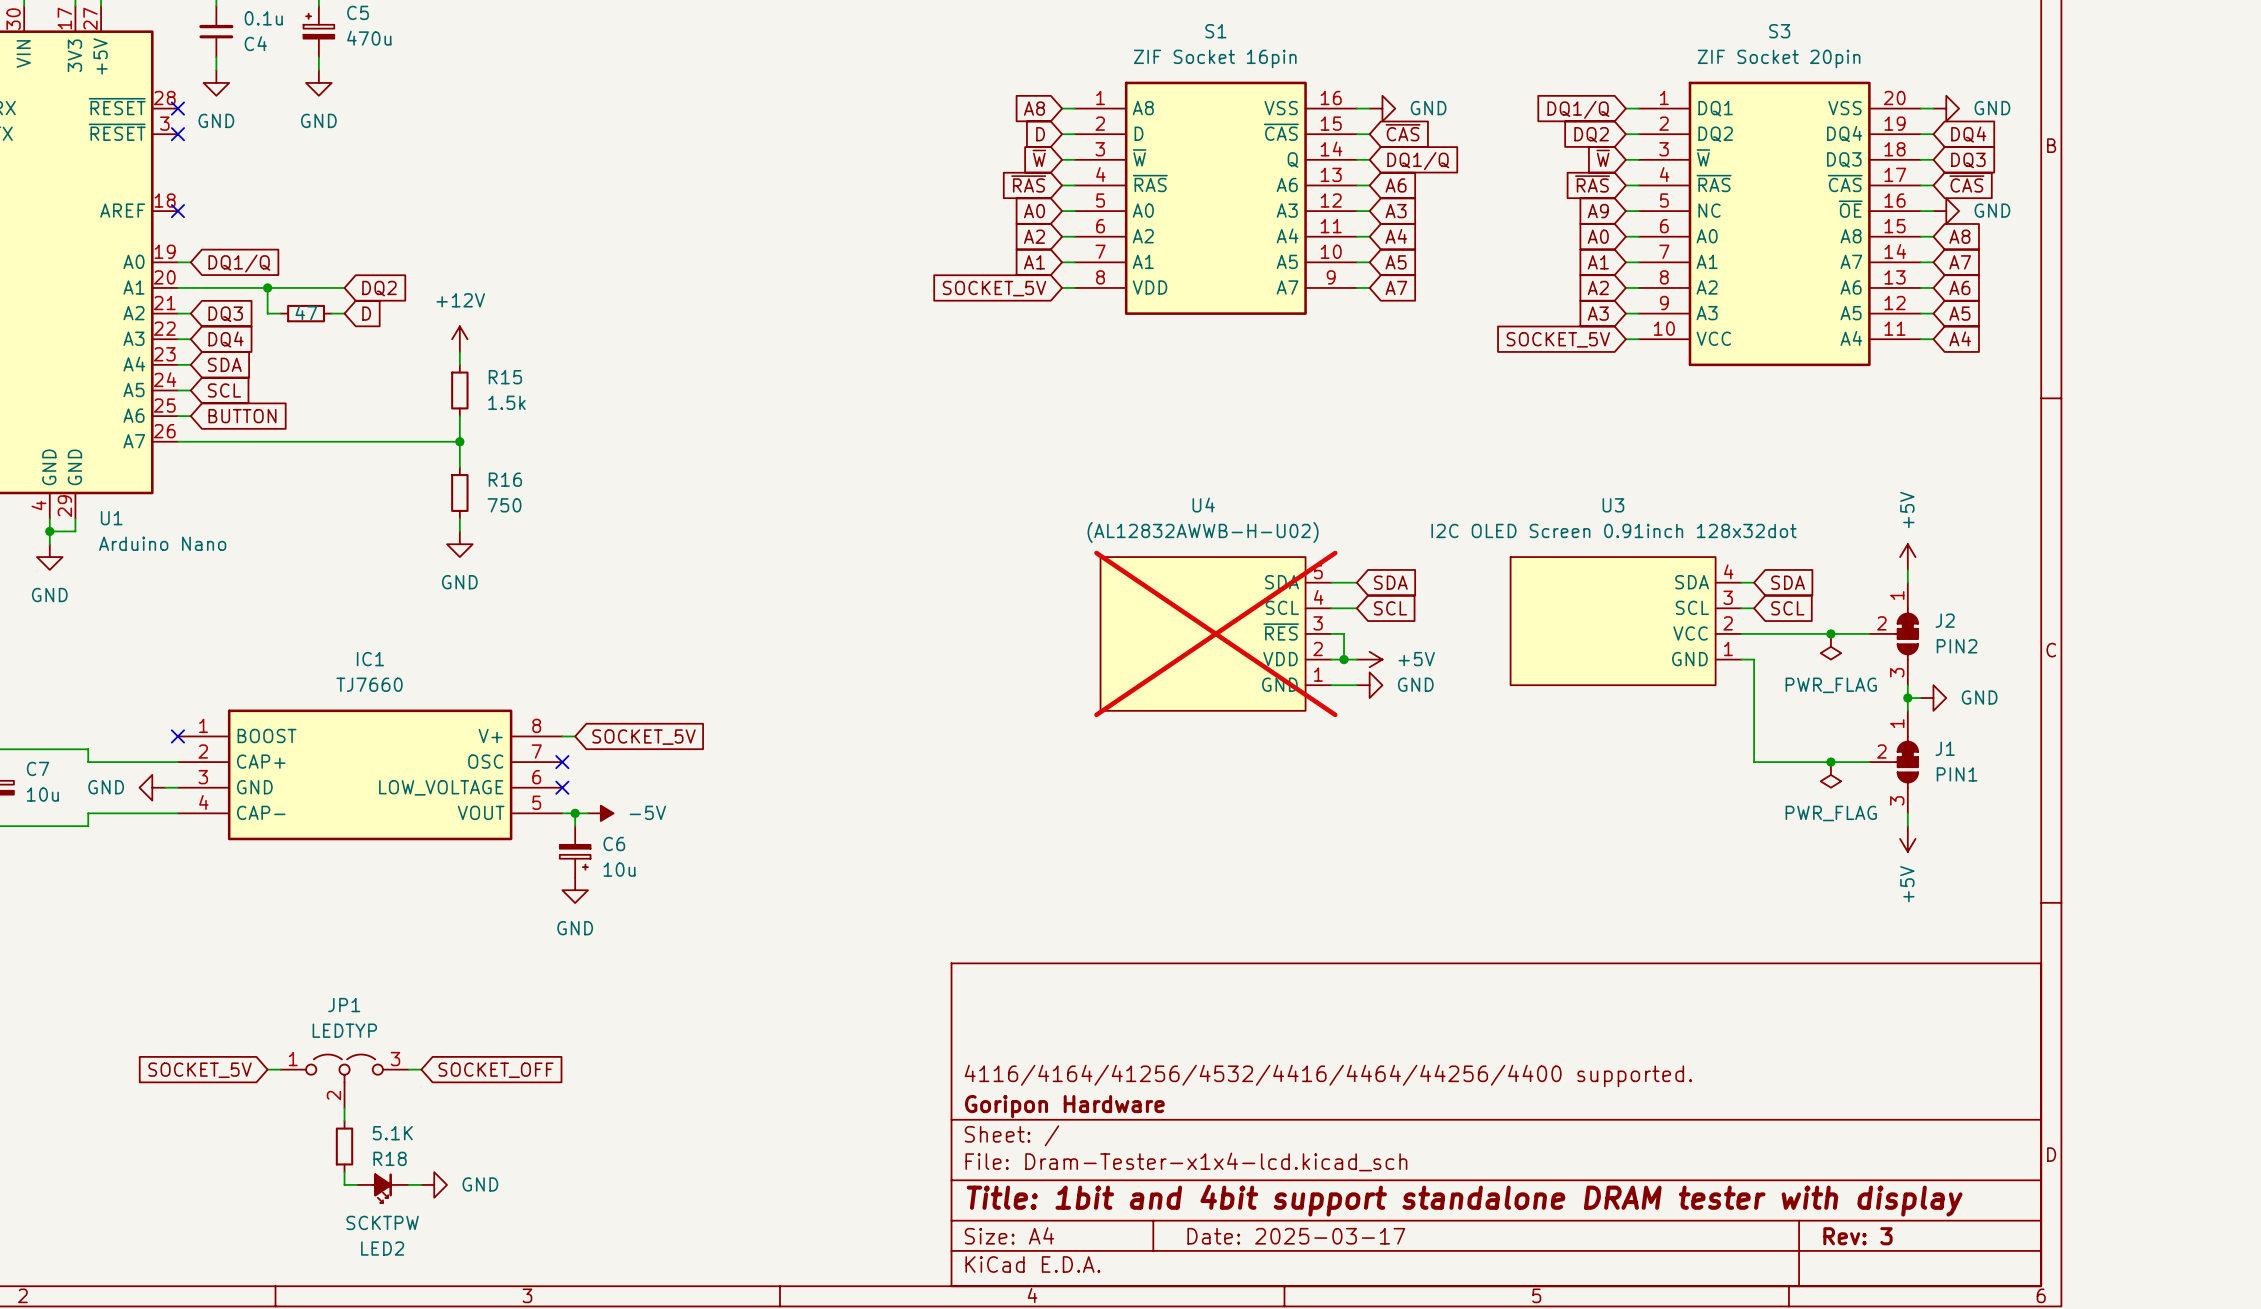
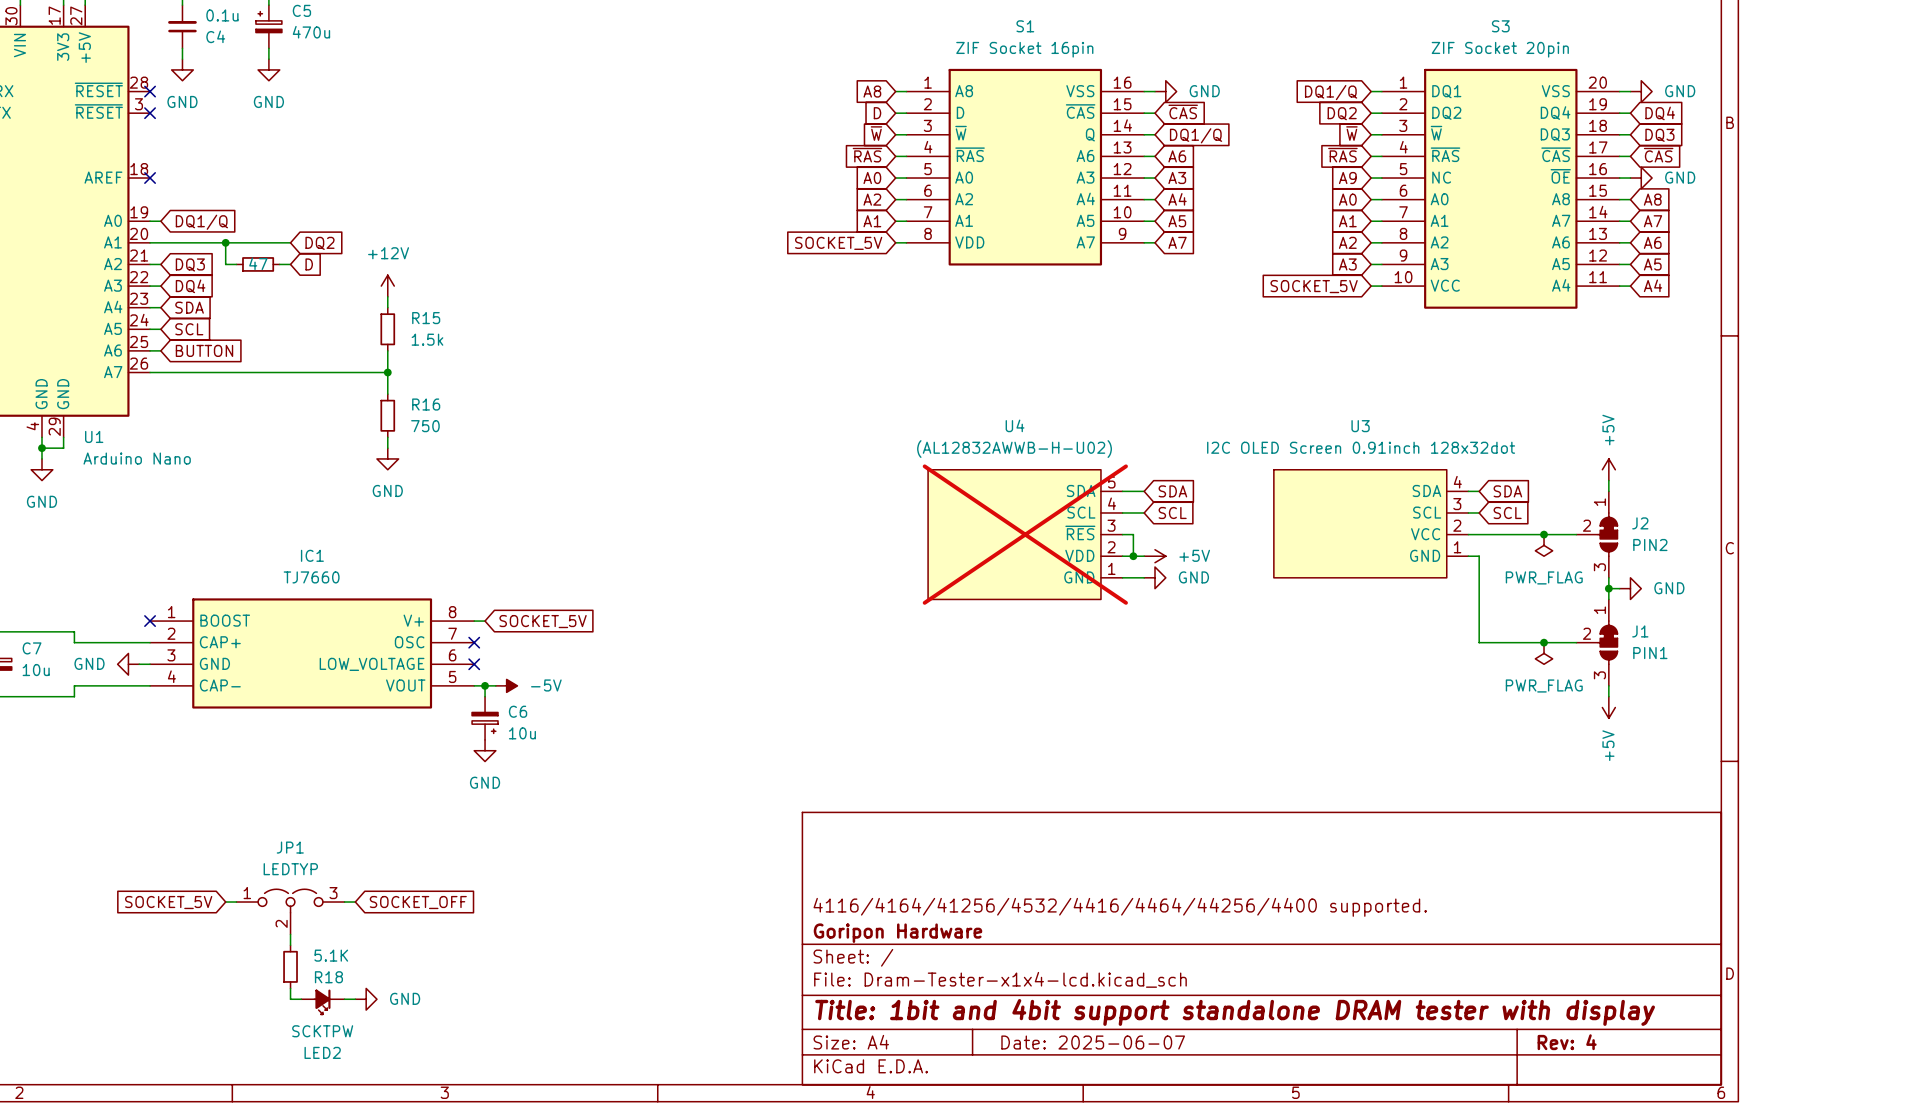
title block: Date: 2025-03-17 (1296, 1236) -> Date: 2025-06-07 (1093, 1042)
title block: Rev: 3 (1857, 1236) -> Rev: 4 (1567, 1042)

